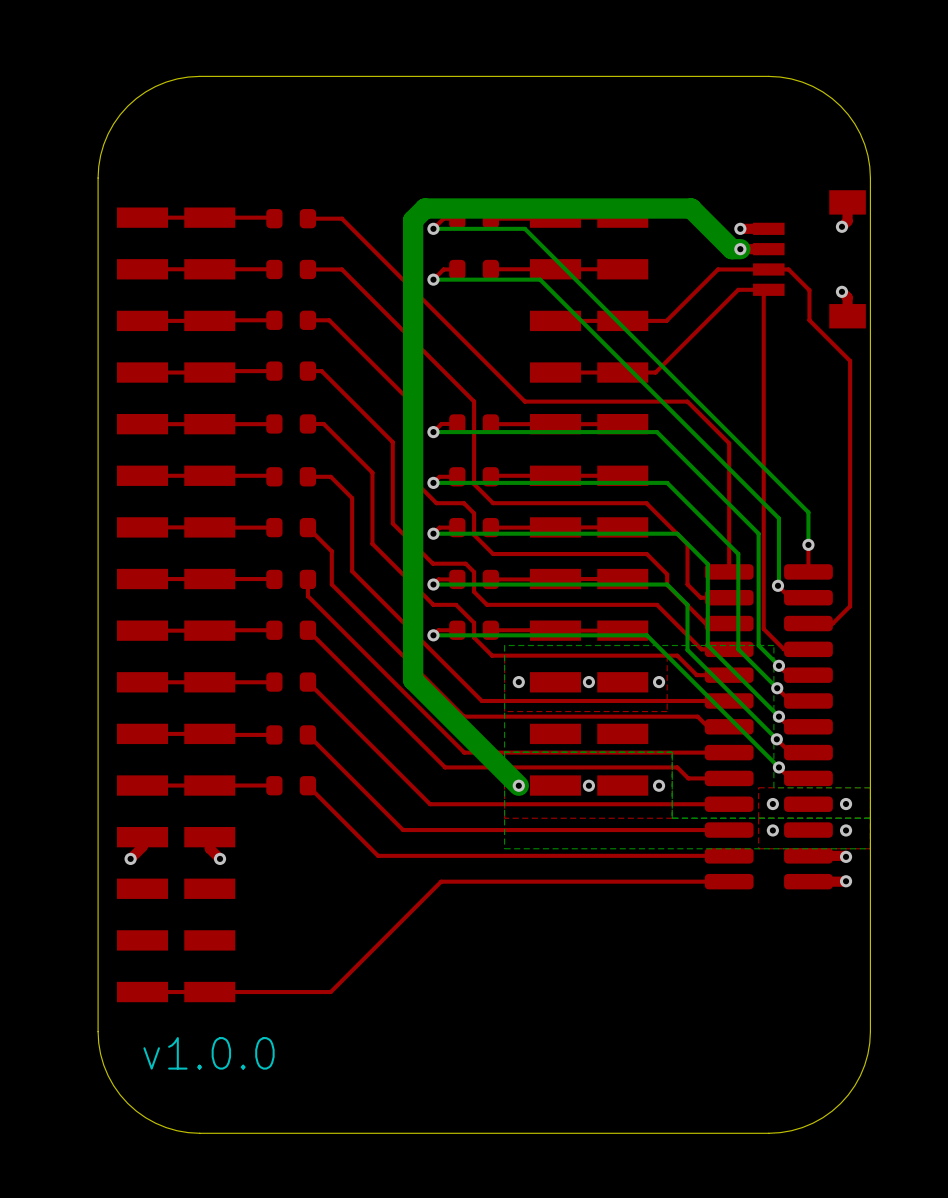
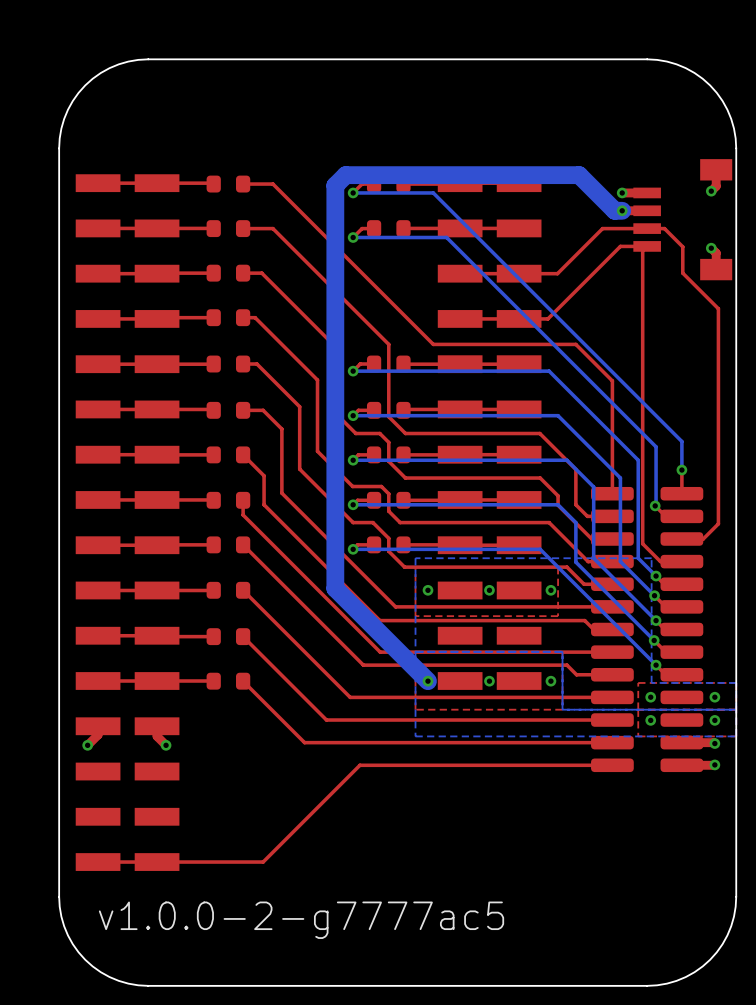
text: v1.0.0 (209, 1053) -> v1.0.0-2-g7777ac5 (301, 920)

